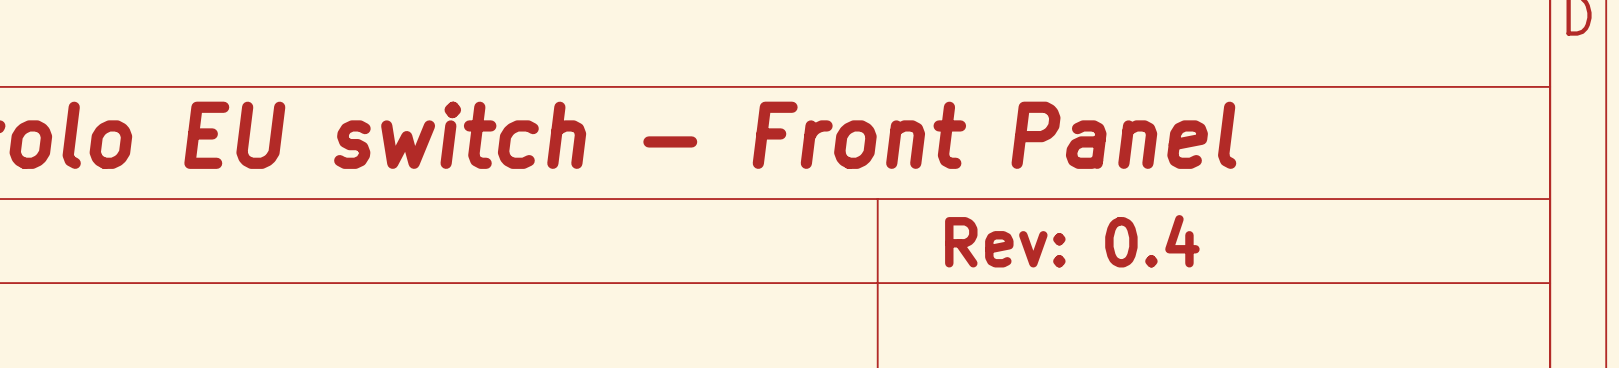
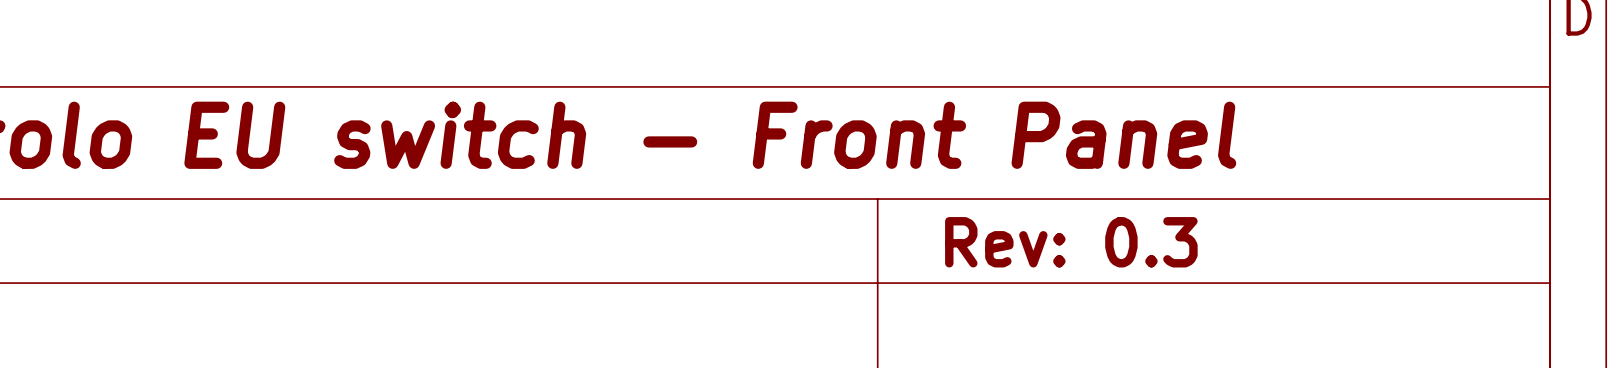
title block: Rev: 0.4 (1072, 241) -> Rev: 0.3 (1071, 242)

